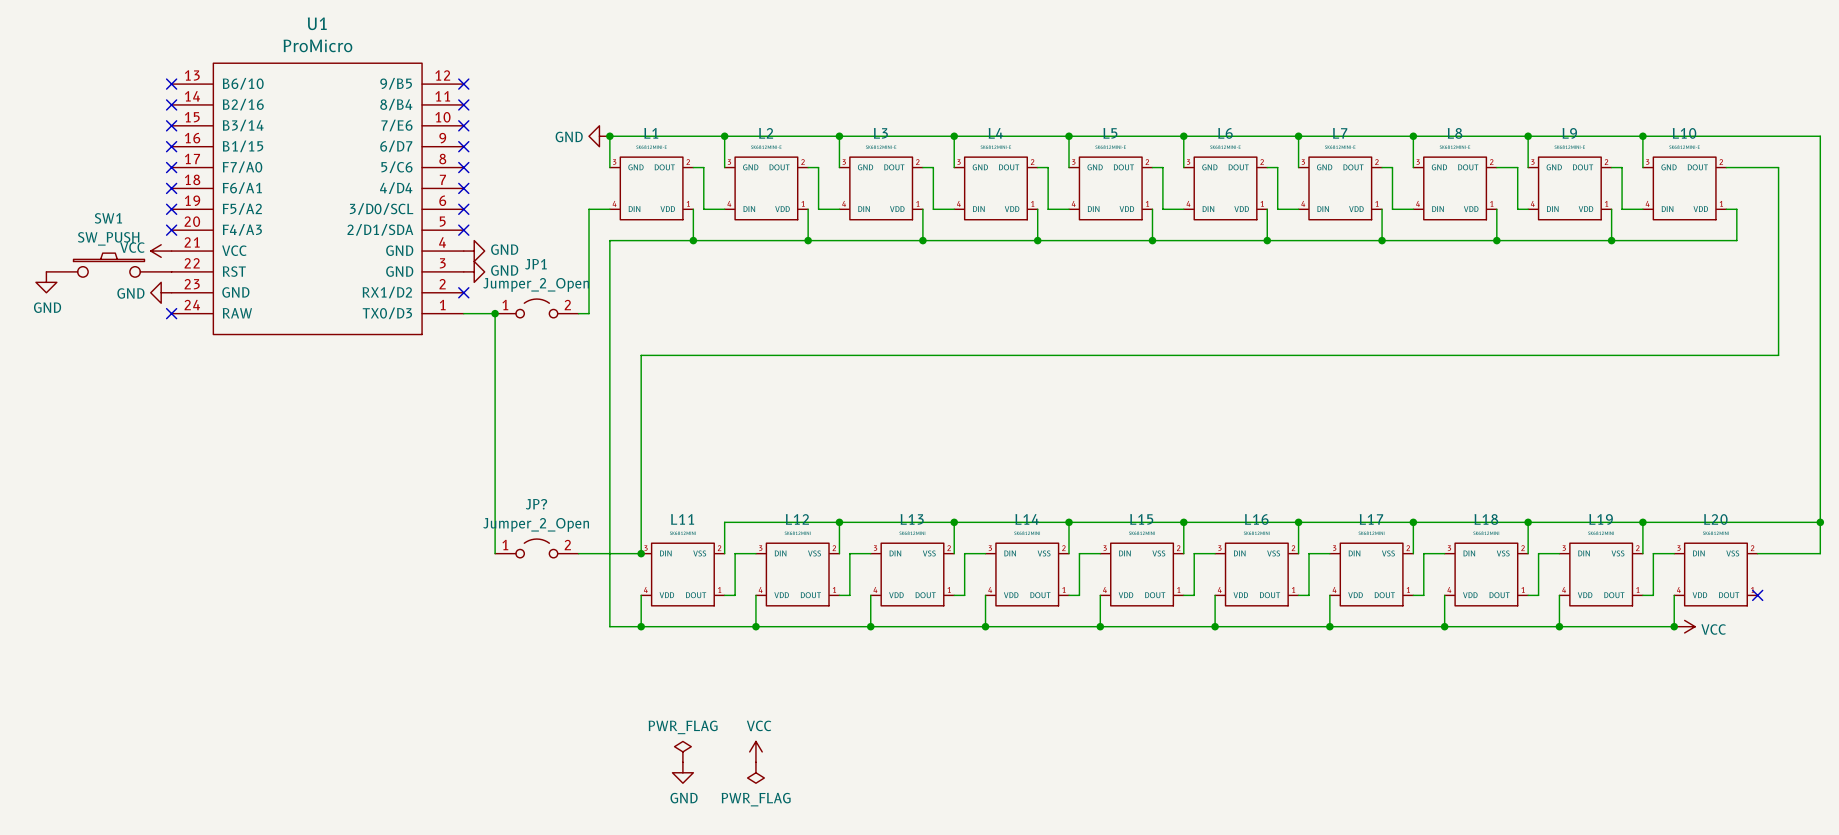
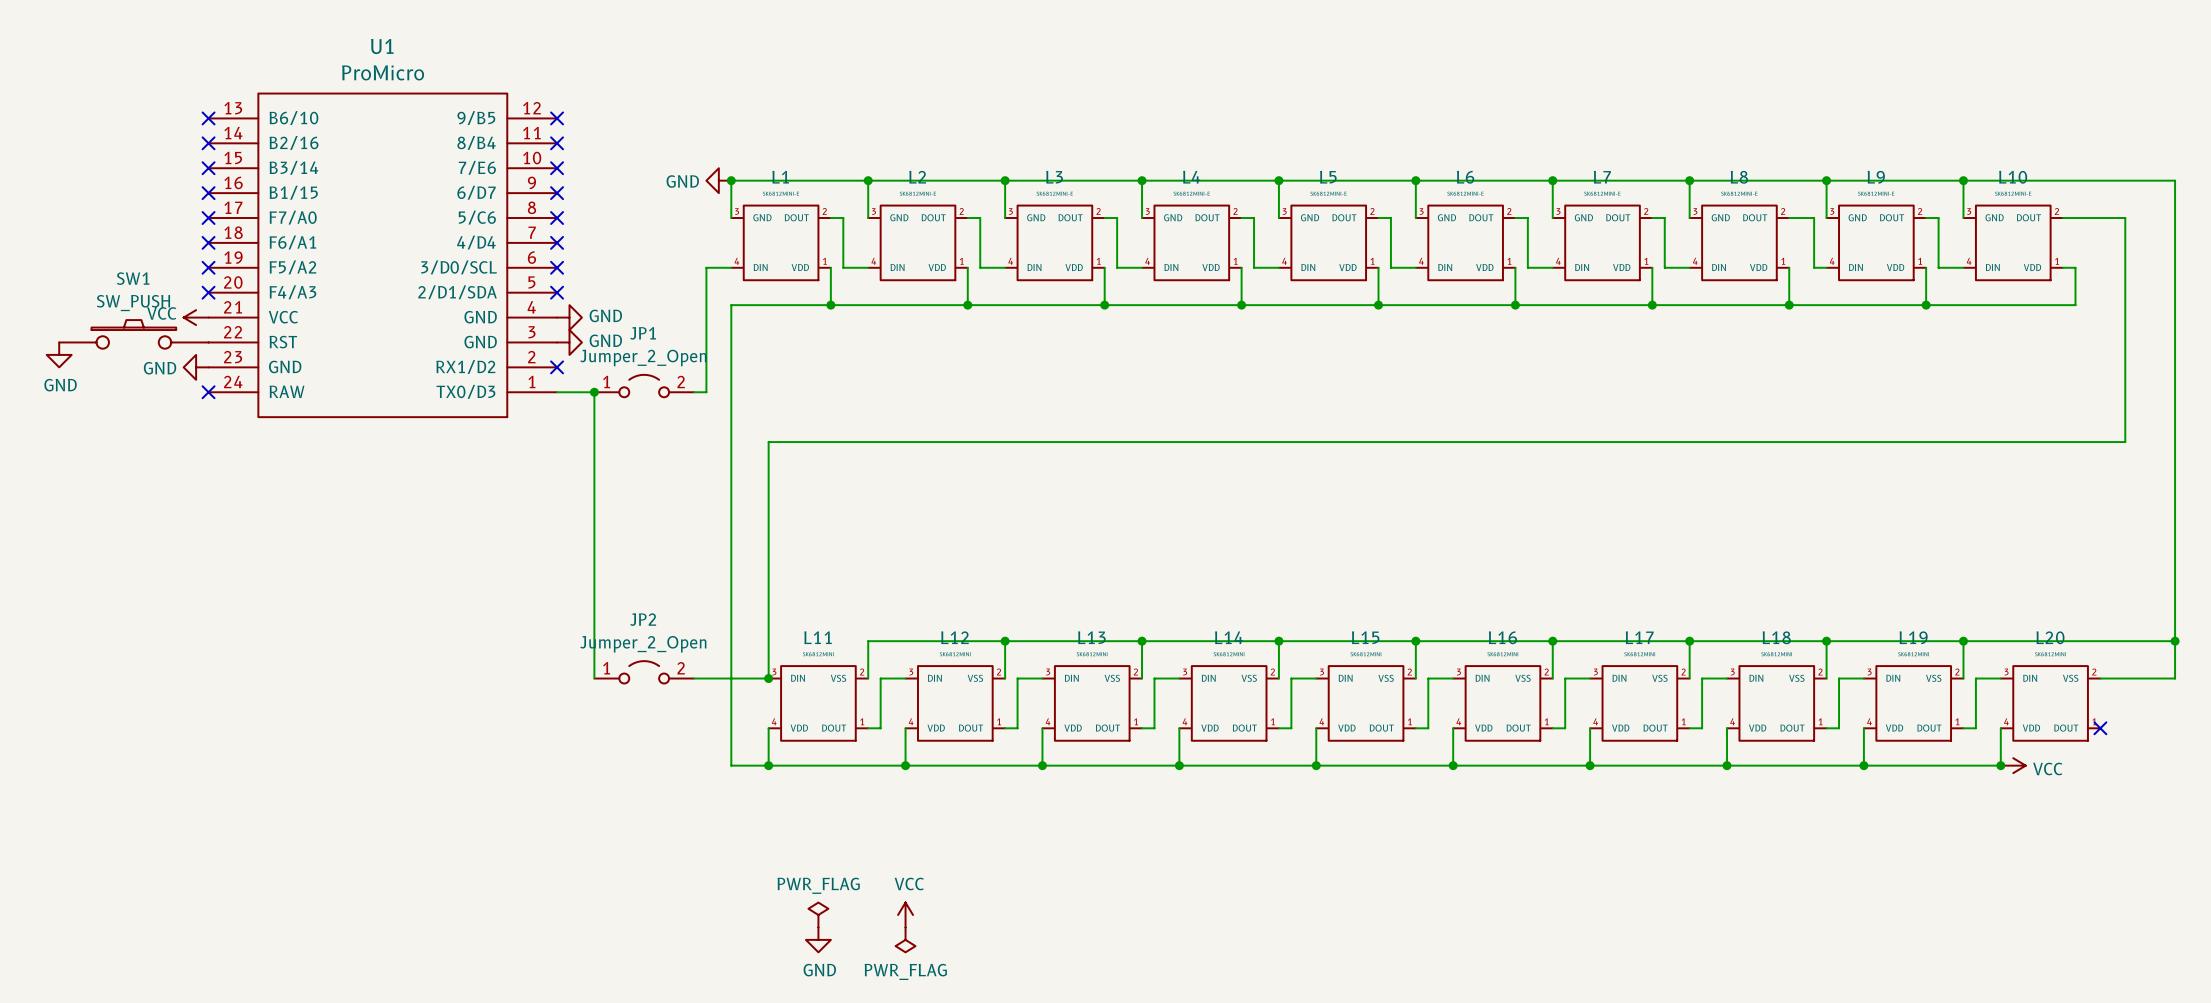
JP? name: JP? (536, 504) -> JP2 (643, 619)

